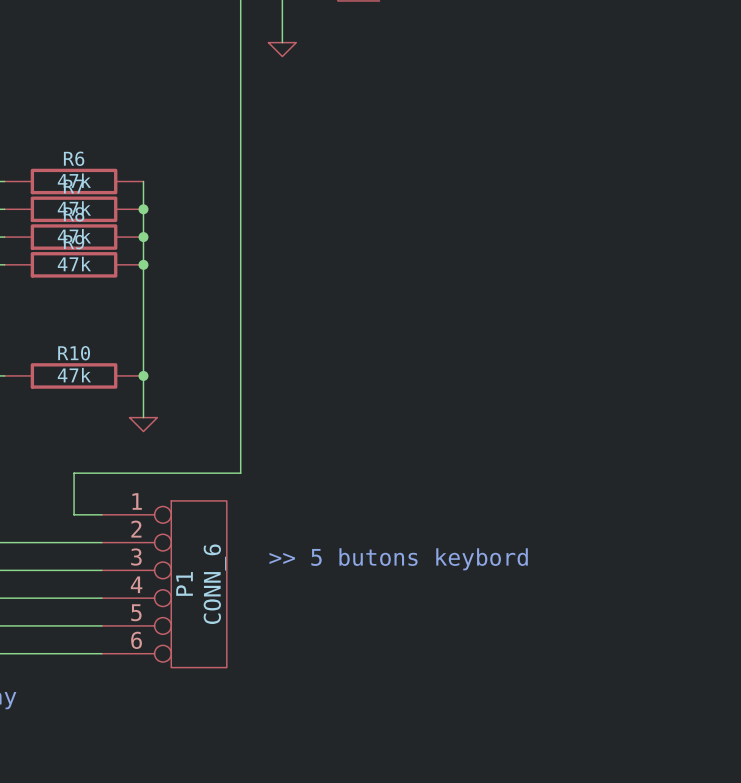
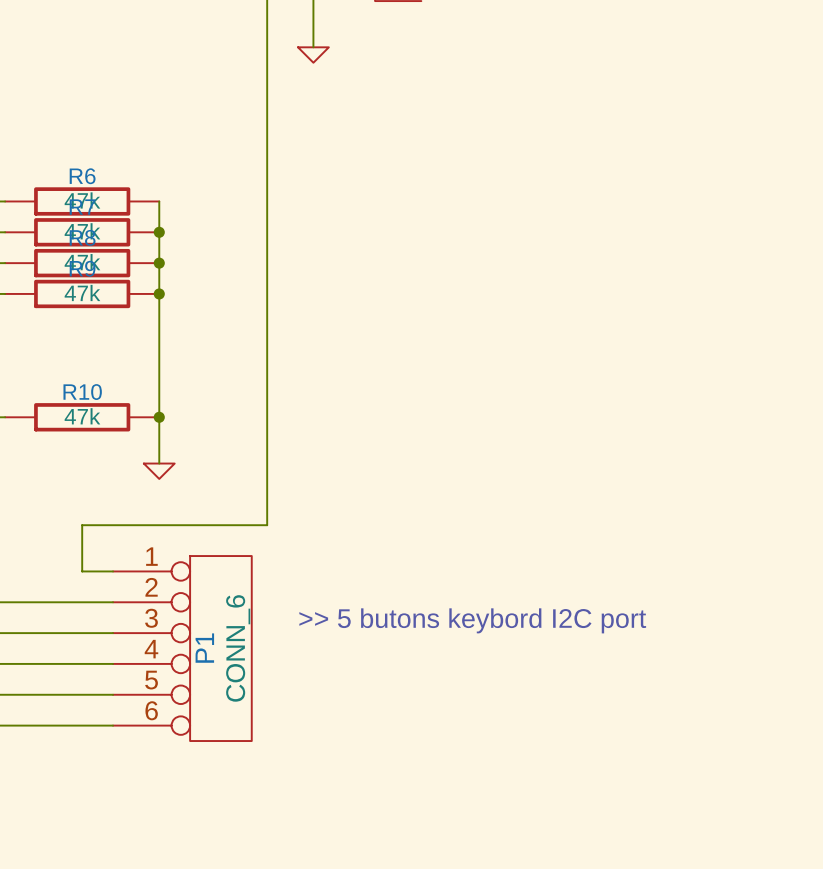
text: >> 5 butons keybord (398, 559) -> >> 5 butons keybord I2C port (472, 620)

